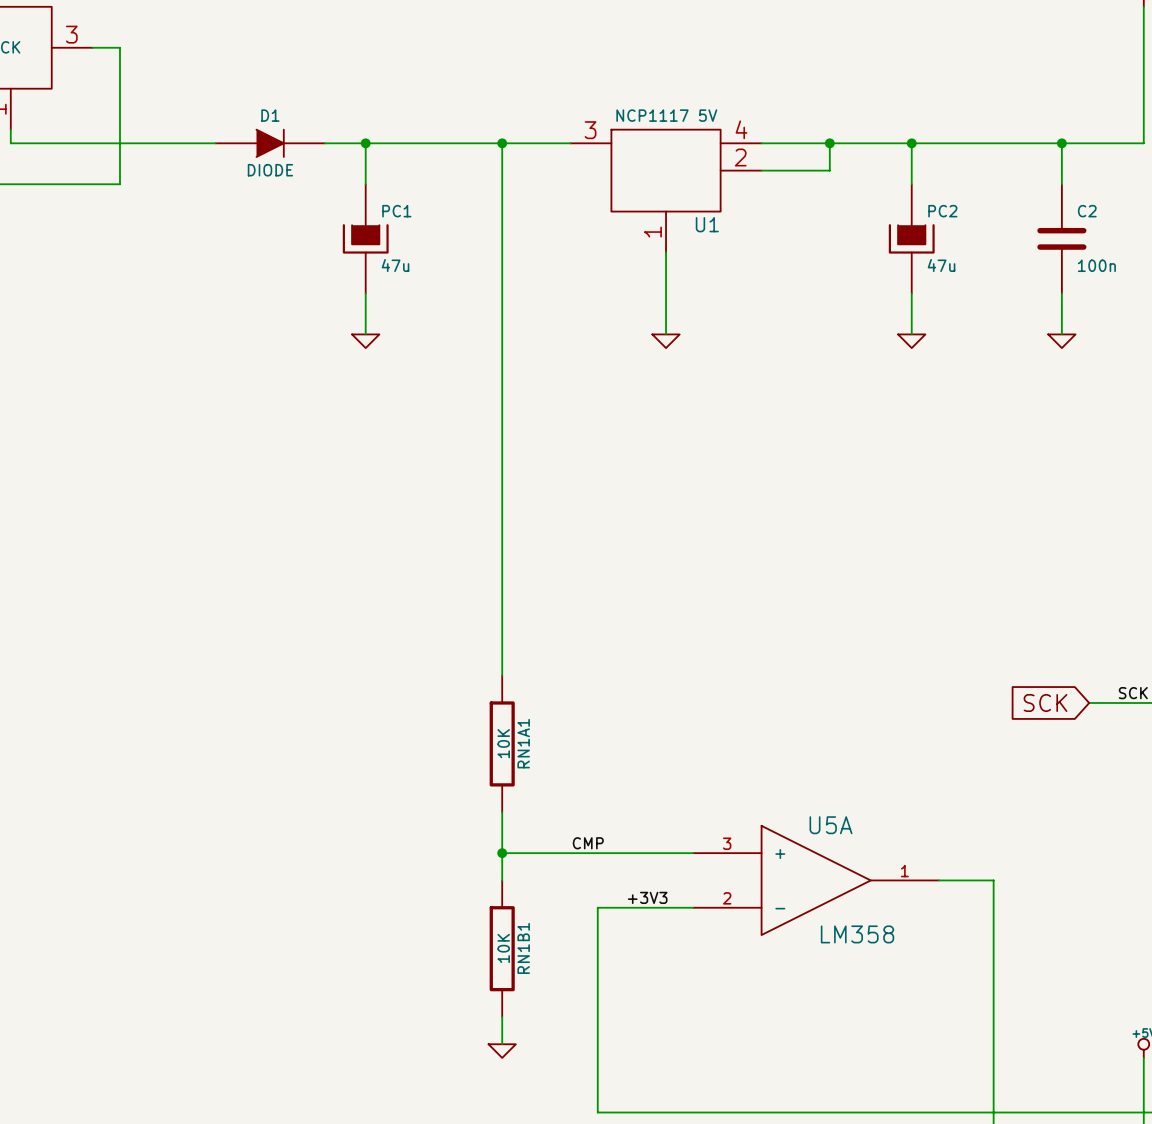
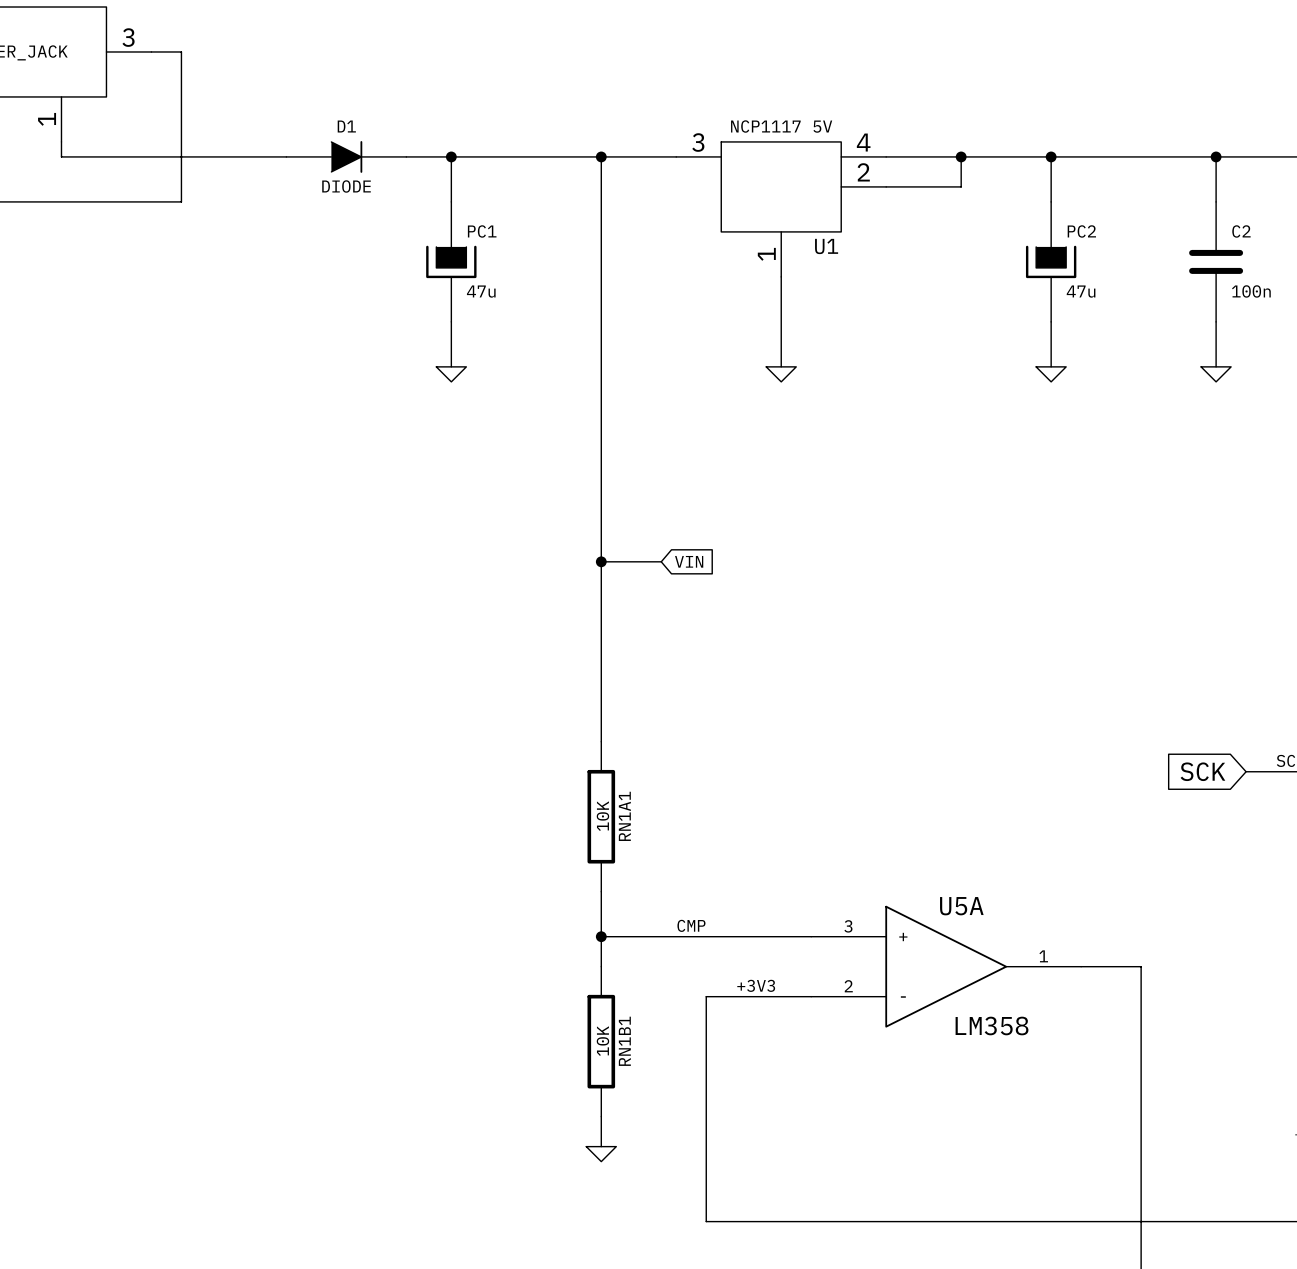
wire: none -> (601, 561) (661, 561)
junction: none -> (601, 561)
global label: none -> VIN (689, 561)

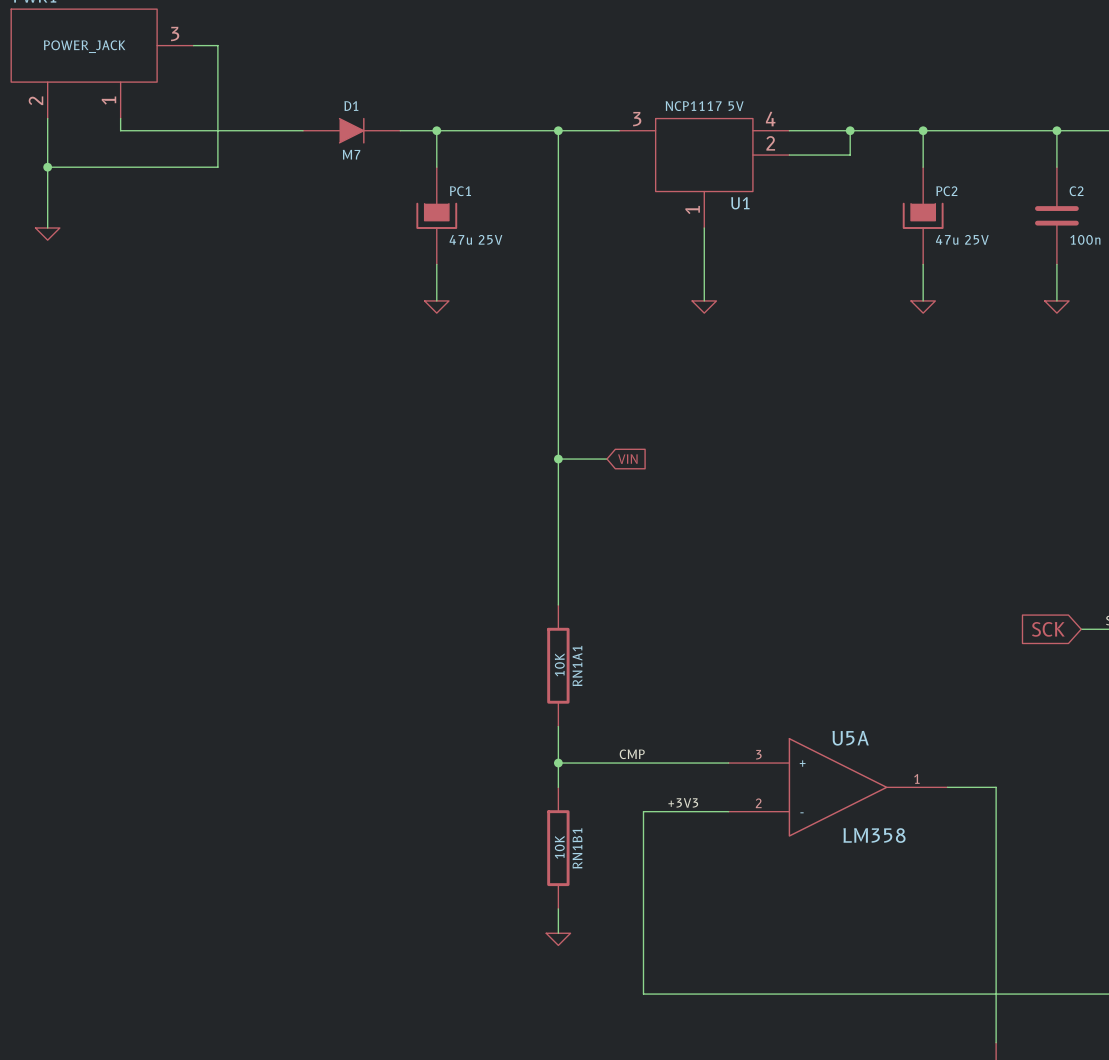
D1 value: DIODE (346, 186) -> M7 (351, 154)
PC1 value: 47u (481, 291) -> 47u 25V (475, 239)
PC2 value: 47u (1081, 291) -> 47u 25V (962, 239)

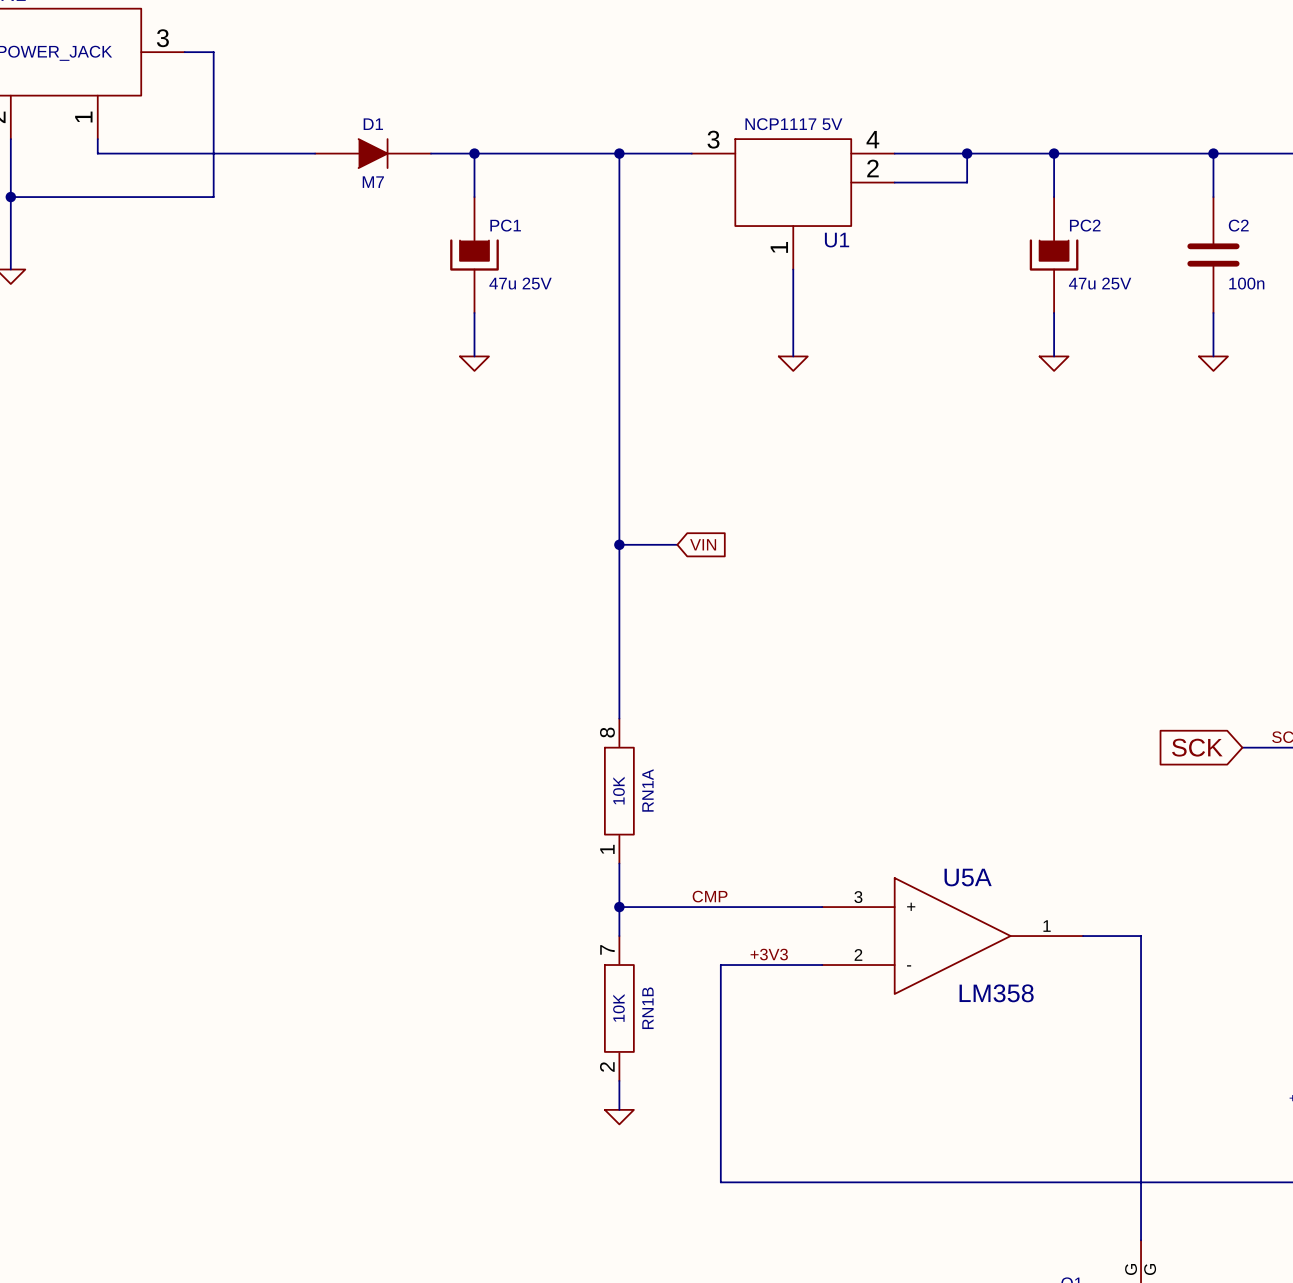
RN1A1: 10K (558, 665) -> none
RN1A: none -> 10K (619, 791)
RN1B1: 10K (558, 848) -> none
RN1B: none -> 10K (619, 1008)

